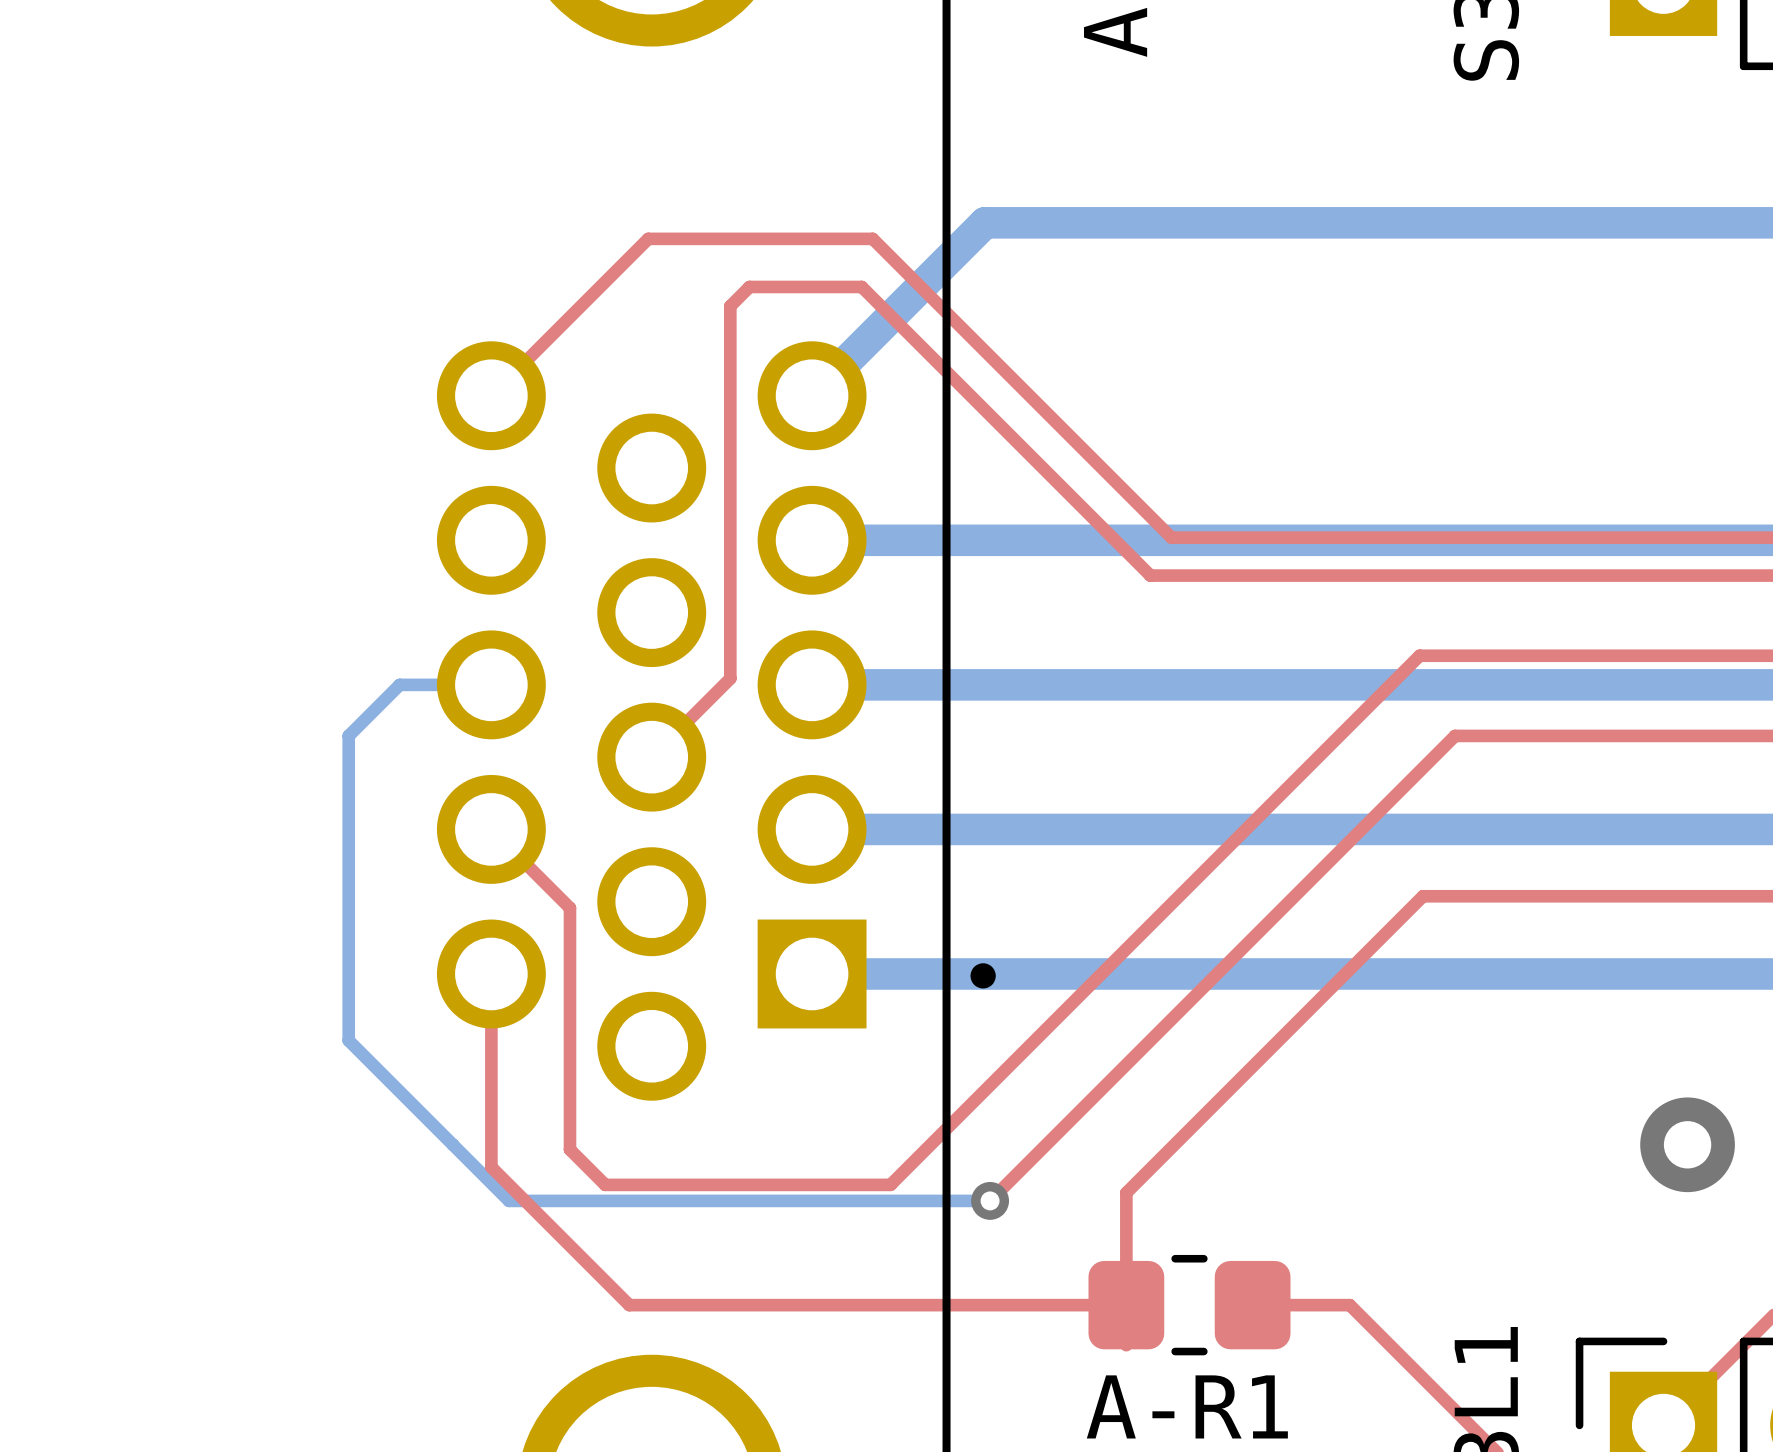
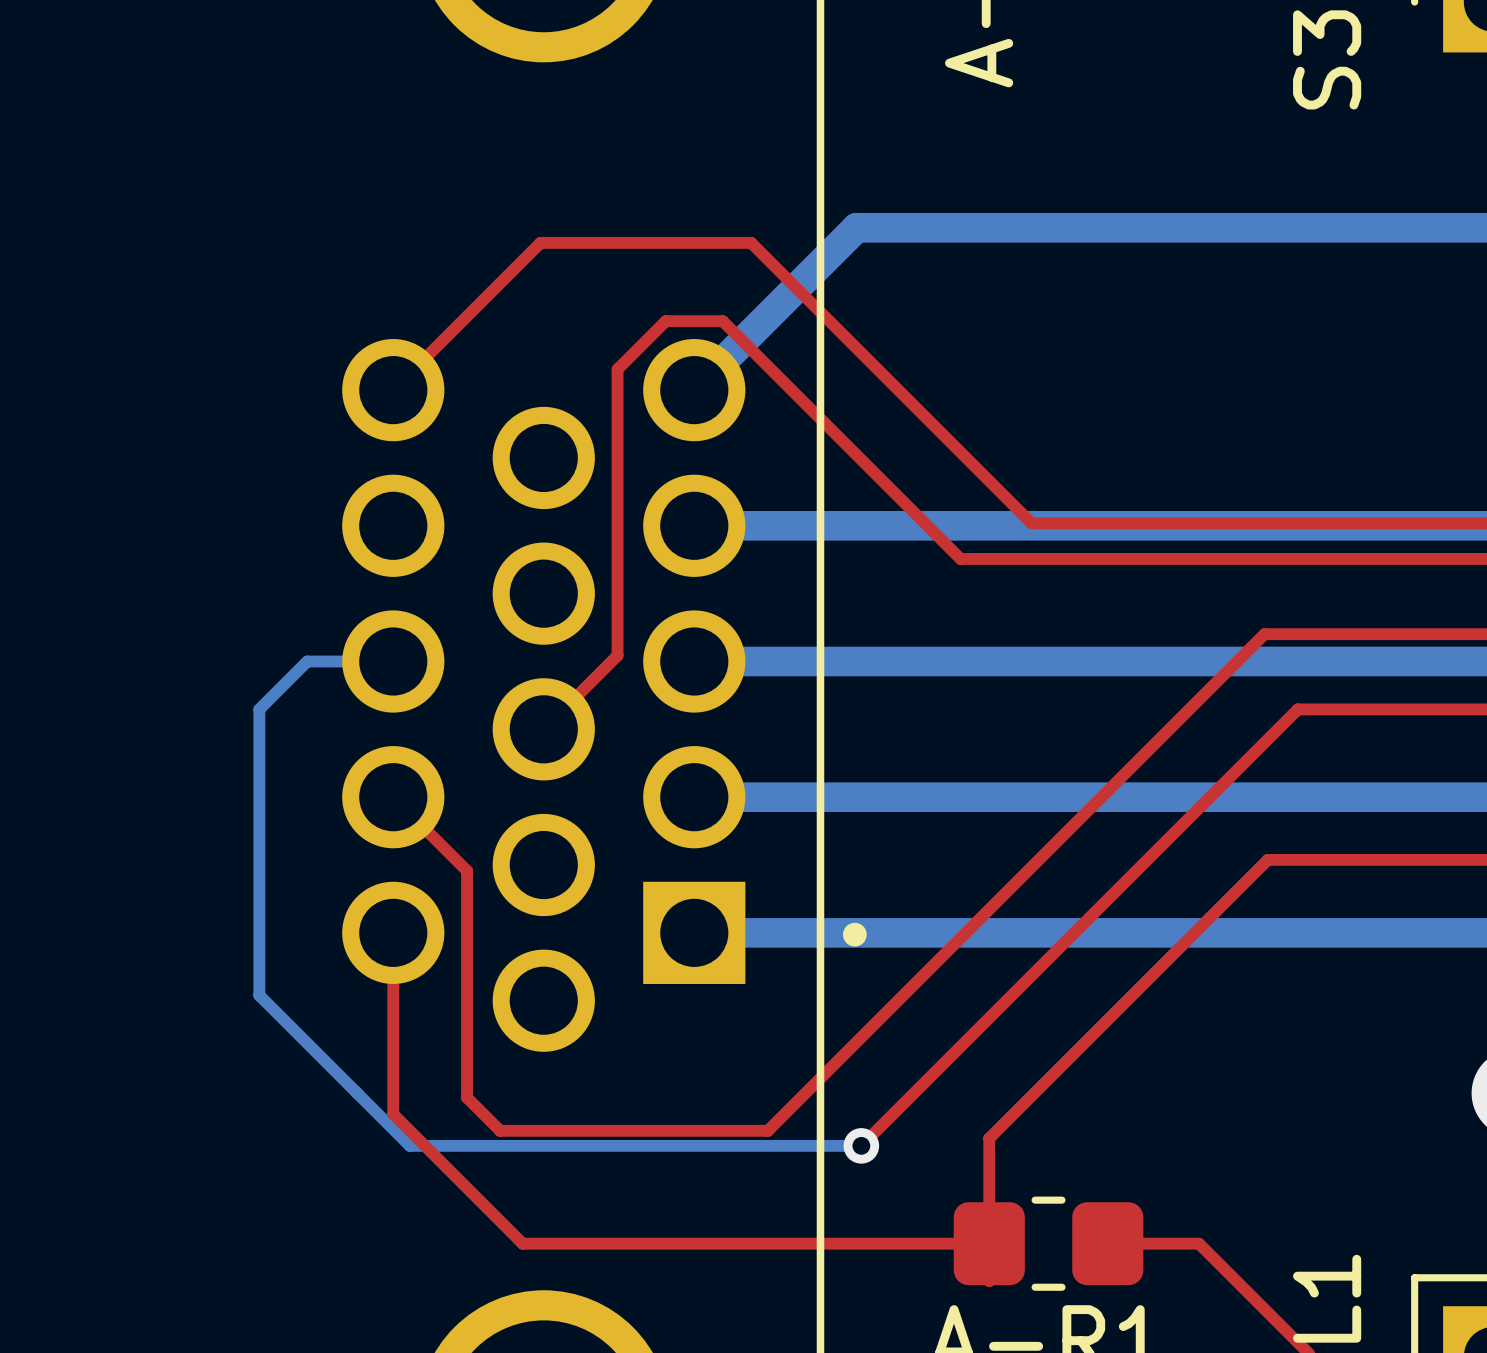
top track: (730, 373) (730, 306) (749, 286) (861, 286) (1150, 575) -> (617, 369) (665, 321) (722, 321) (960, 558) (1011, 558)

